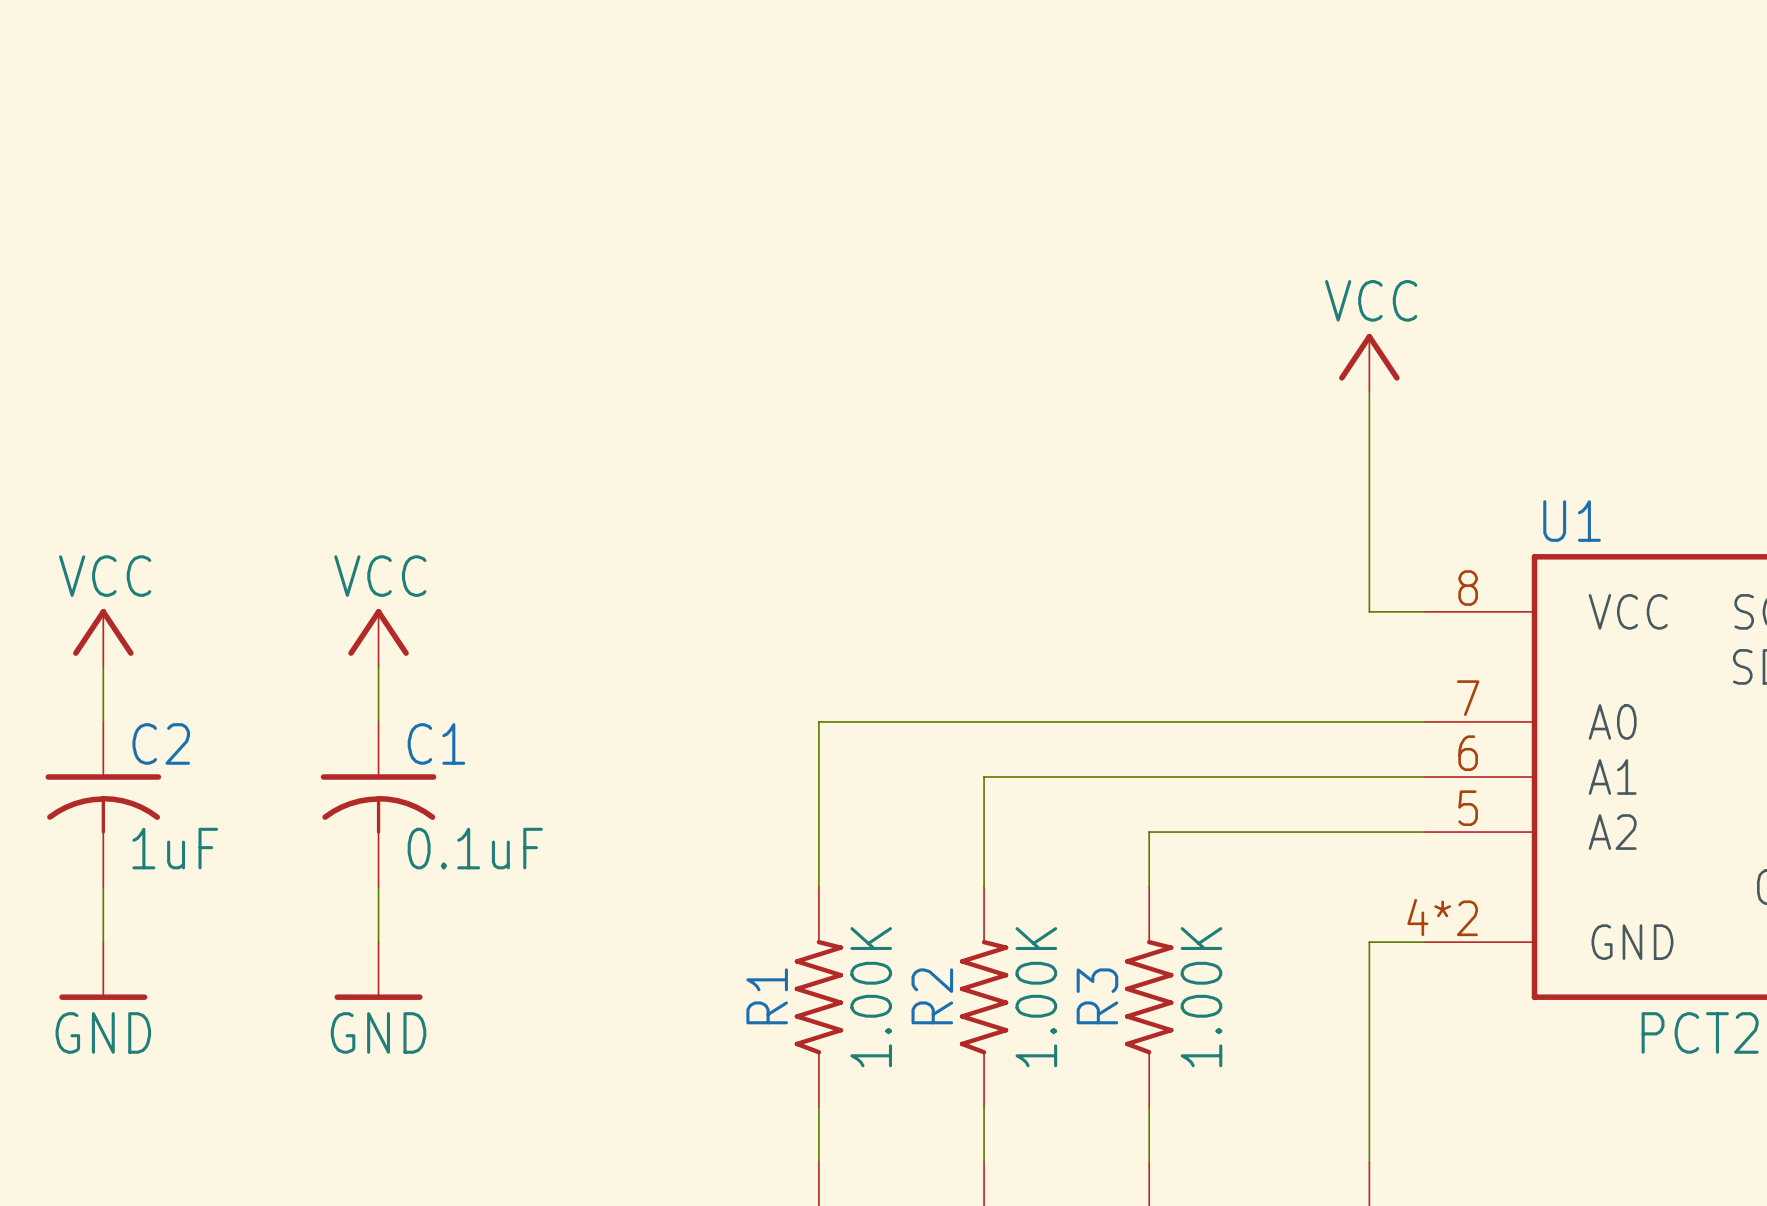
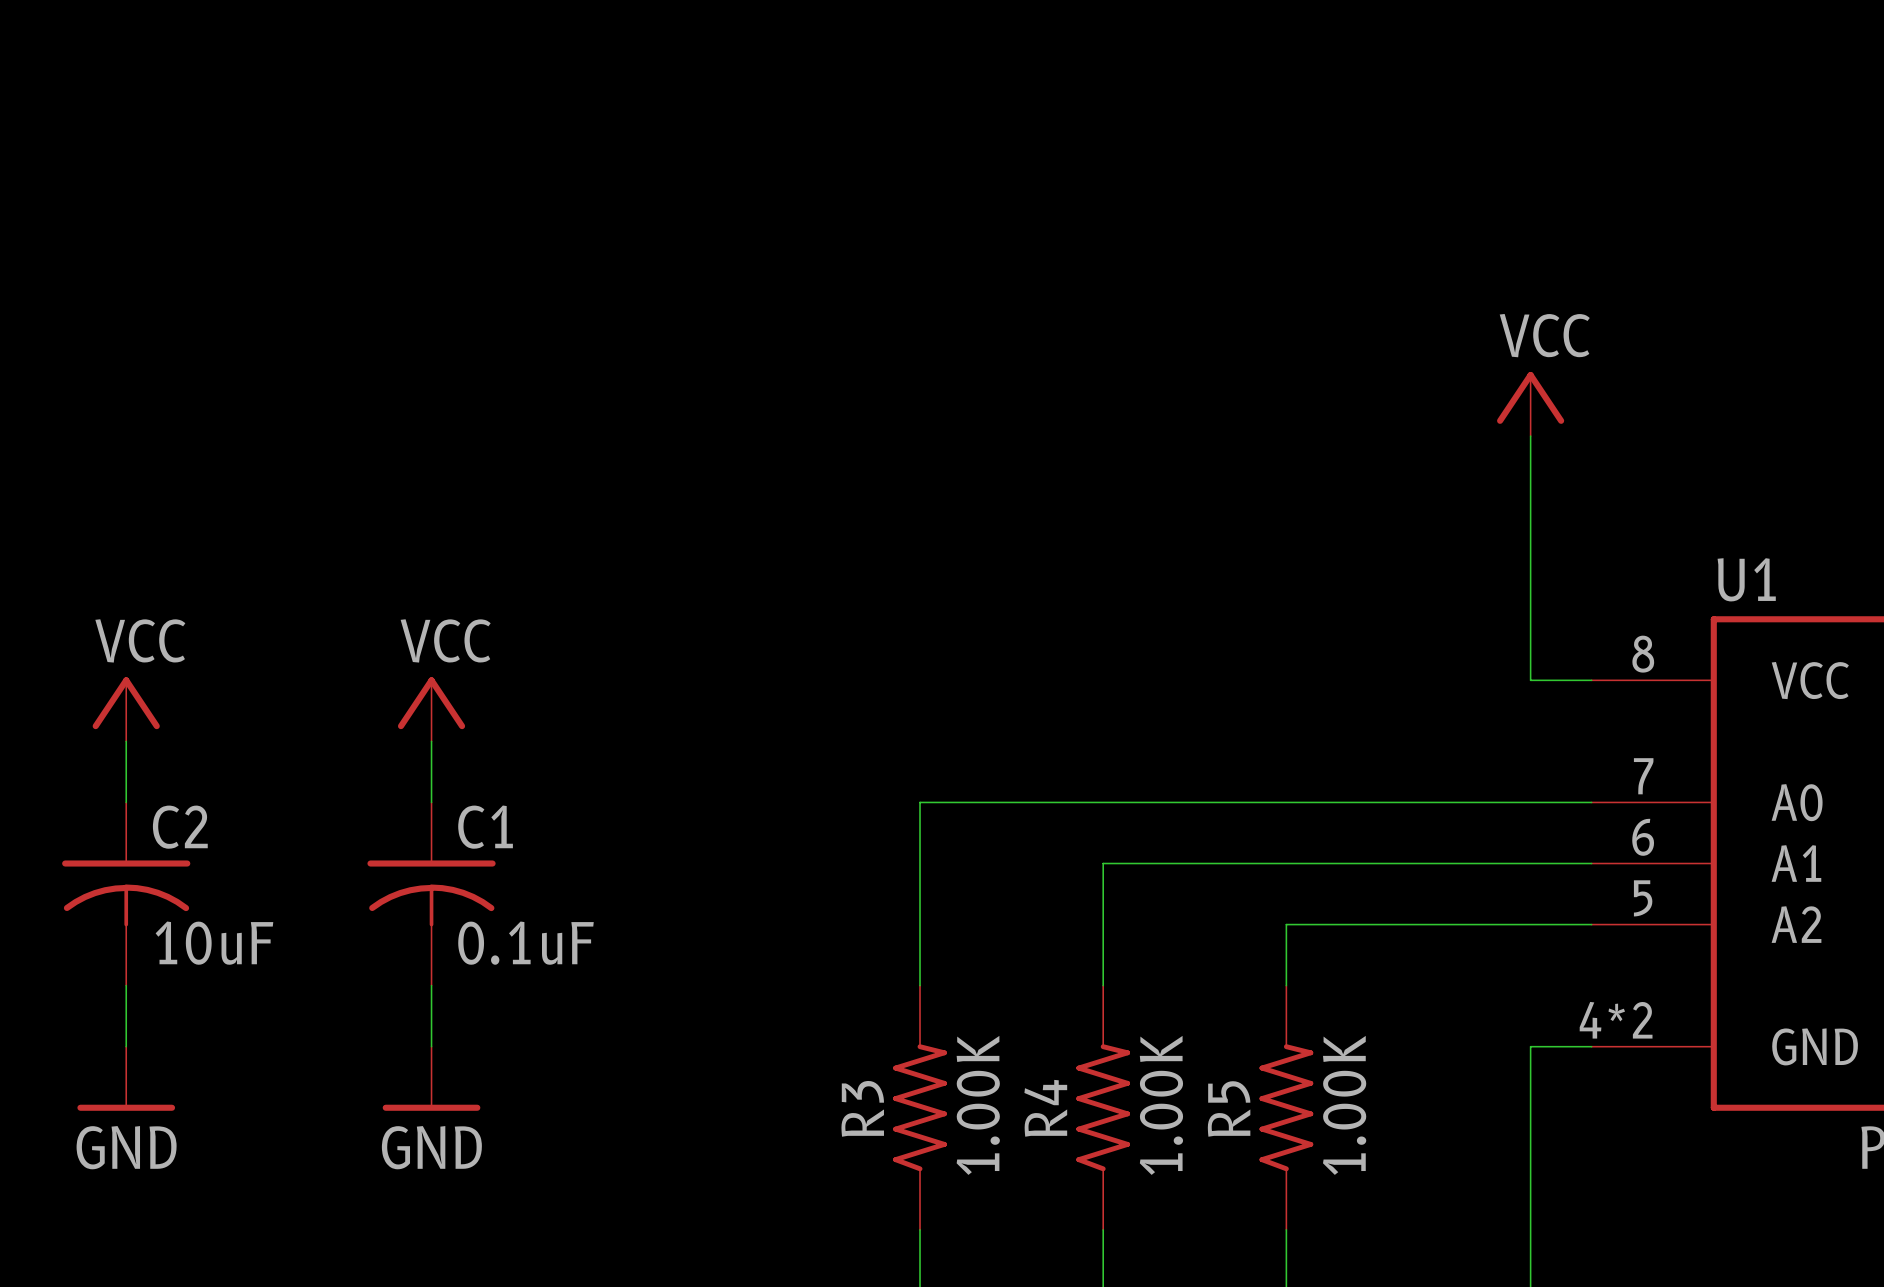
C2 value: 1uF (175, 848) -> 10uF (214, 943)
R1 name: R1 (767, 996) -> R3 (862, 1108)
R2 name: R2 (932, 996) -> R4 (1045, 1108)
R3 name: R3 (1097, 996) -> R5 (1229, 1108)

